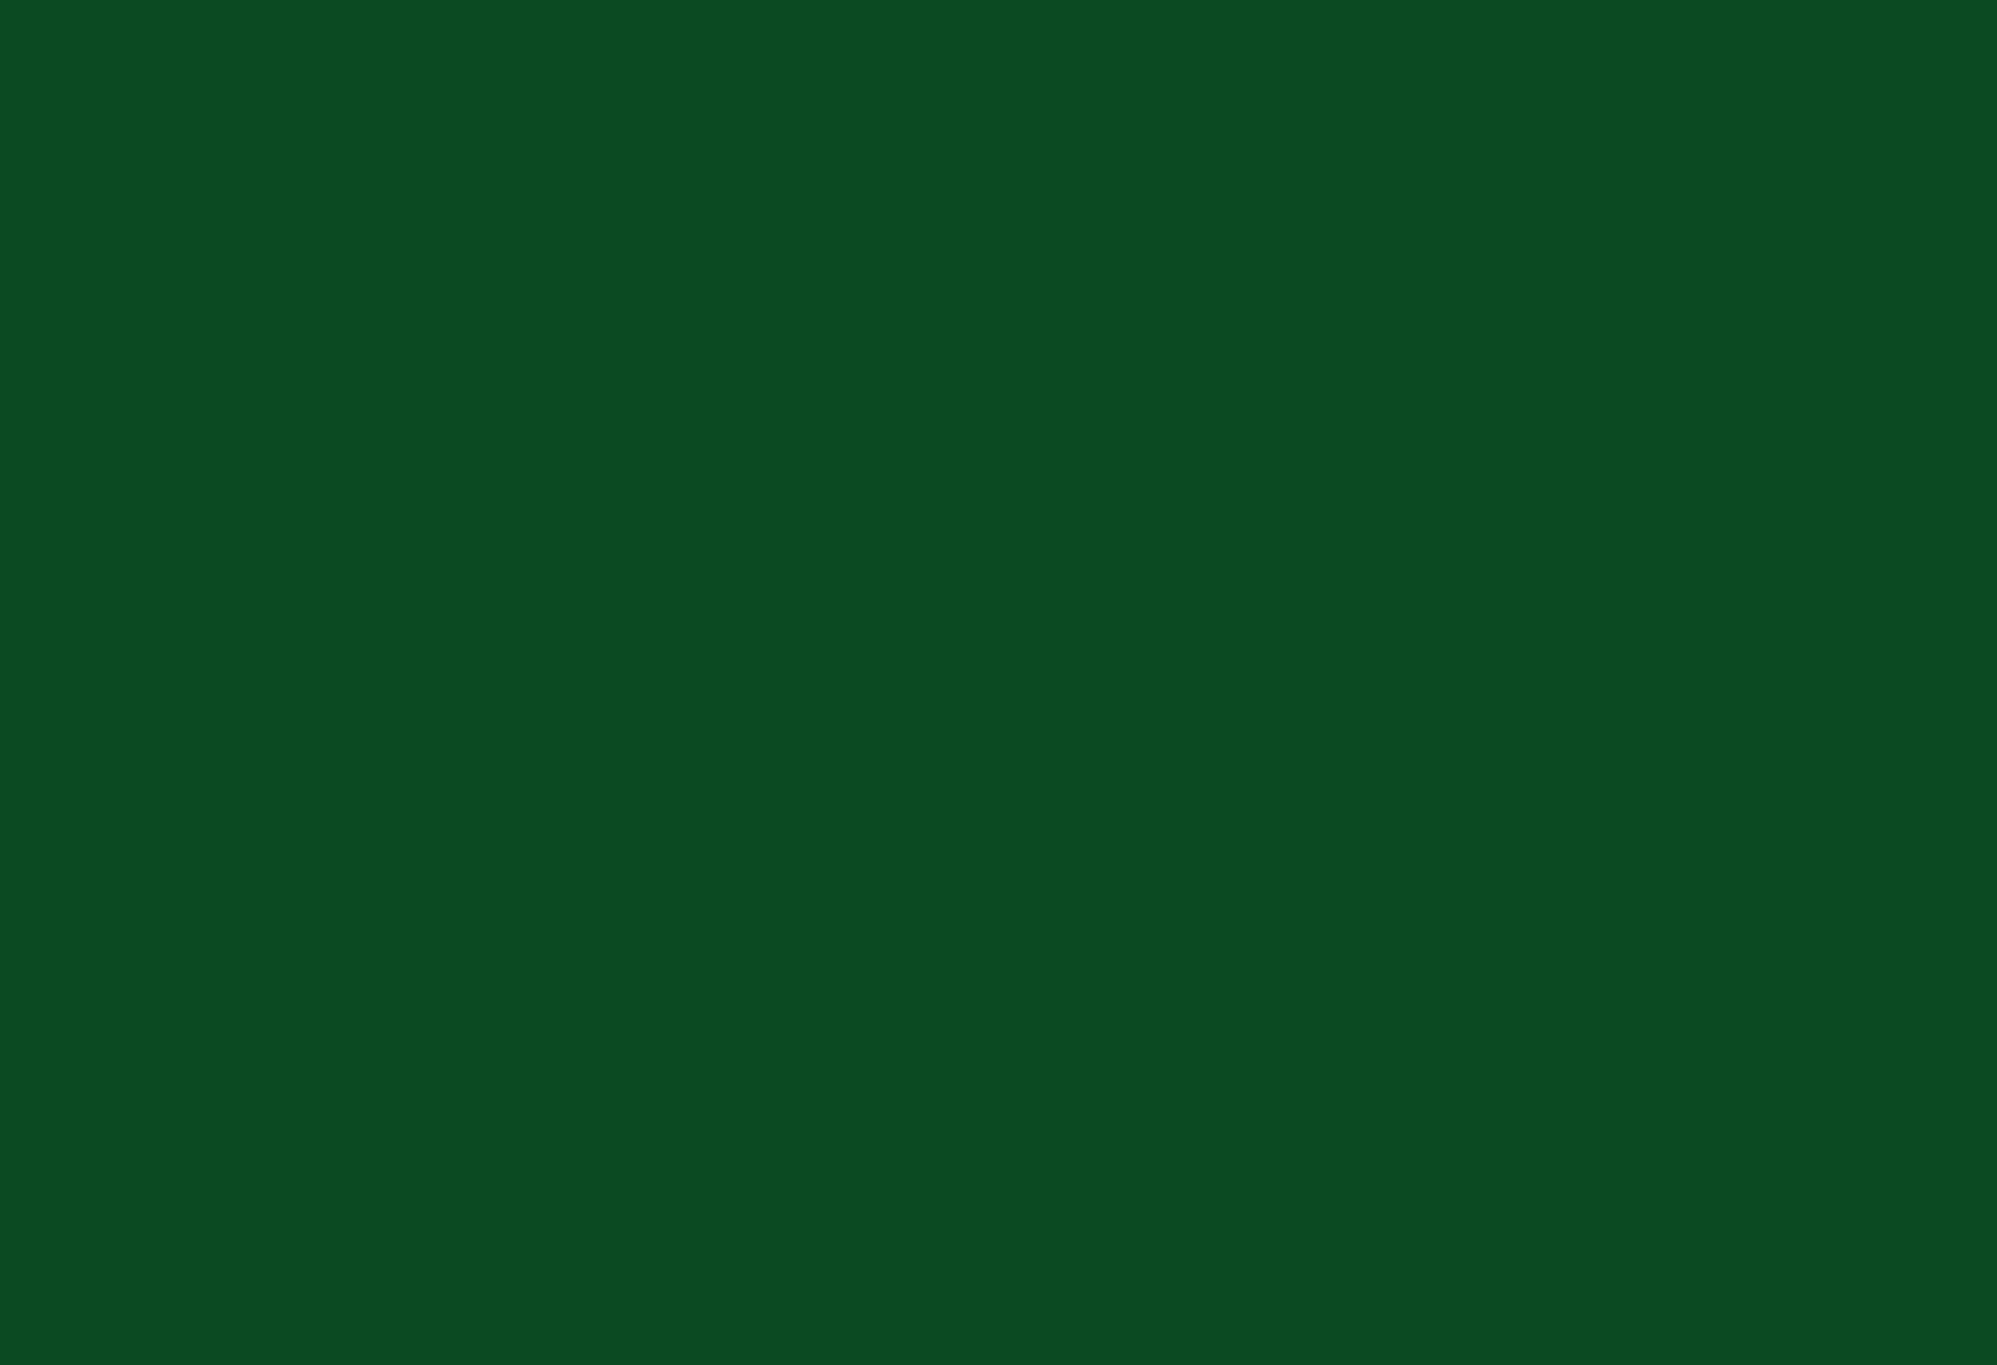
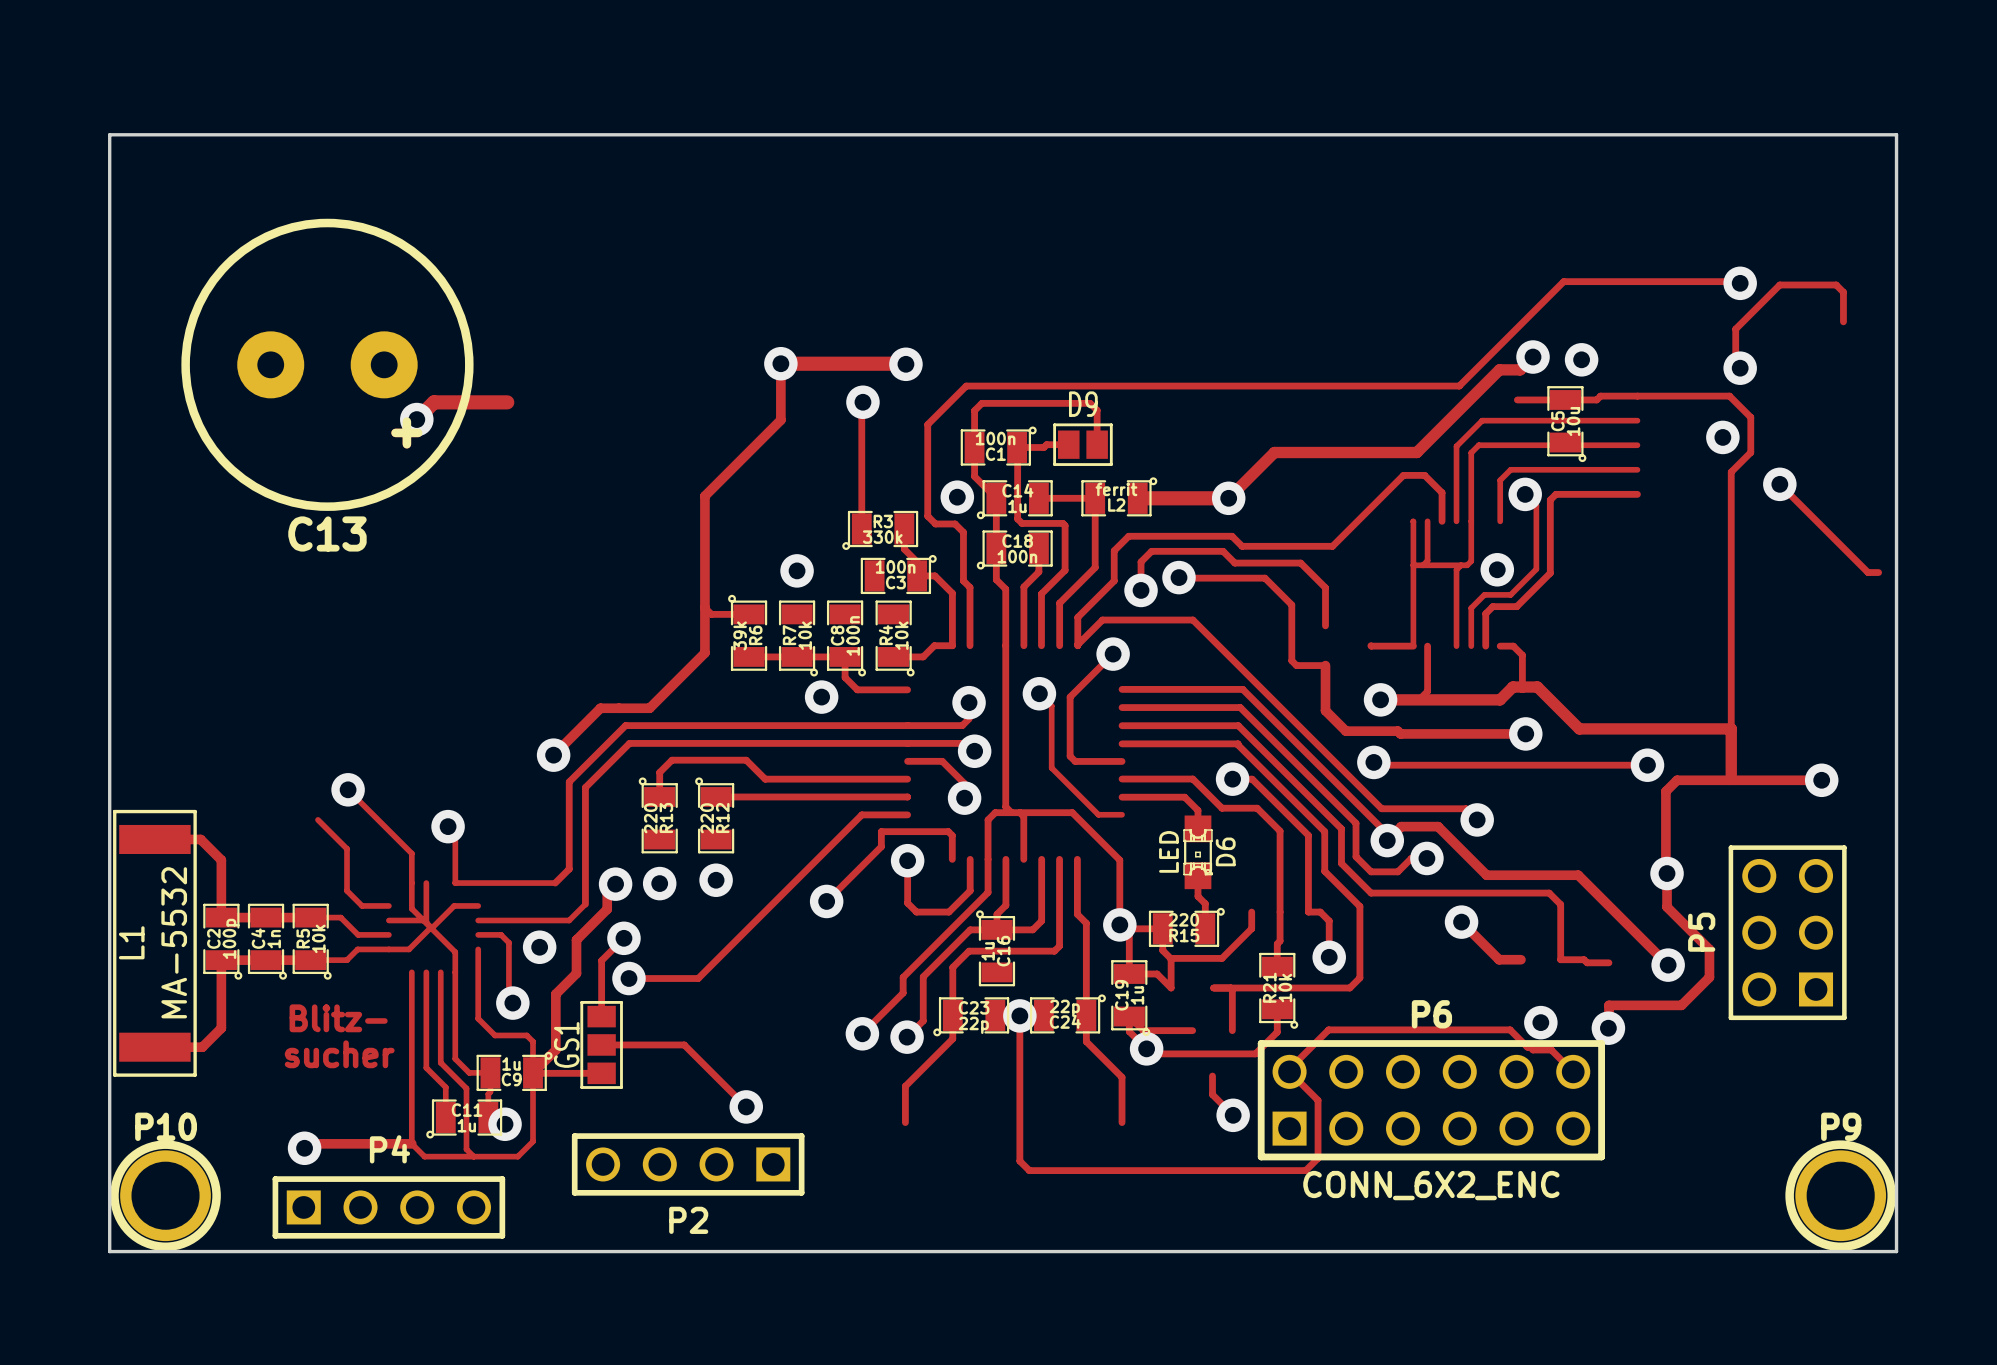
board edge: none -> (109, 134) (1896, 134) (1896, 1251) (109, 1251) (109, 134)
track: none -> (1740, 283) (1738, 281) (1563, 281) (1459, 386) (966, 386) (927, 424) (927, 516) (935, 523) (955, 523) (963, 532) (963, 580) (970, 587) (970, 645)
via: none -> (1740, 283)
track: none -> (1843, 321) (1843, 292) (1836, 284) (1779, 284) (1735, 329) (1735, 363) (1740, 368)
track: none -> (1533, 357) (1520, 369) (1499, 369) (1416, 452) (1274, 452) (1228, 498) (1137, 498)
via: none -> (1533, 357)
via: none -> (1581, 359)
via: none -> (780, 363)
C13: none -> (327, 364)
track: none -> (905, 364) (780, 363) (780, 420) (704, 496) (704, 652) (649, 708) (600, 708) (553, 755)
via: none -> (905, 364)
via: none -> (1740, 368)
track: none -> (1517, 399) (1596, 399) (1600, 396) (1729, 396) (1750, 417) (1750, 452) (1731, 472) (1731, 728)
track: none -> (507, 402) (434, 402) (416, 419)
track: none -> (862, 402) (861, 529)
via: none -> (862, 402)
via: none -> (416, 419)
track: none -> (1637, 420) (1482, 420) (1456, 446) (1456, 521)
C5: none -> 10u (1566, 424)
via: none -> (1722, 437)
track: none -> (1068, 444) (1017, 447) (1017, 518) (1022, 523) (1062, 523) (1065, 525) (1065, 570) (1041, 593) (1041, 645)
D9: none -> (1082, 444)
track: none -> (1097, 444) (1097, 410) (1090, 403) (981, 403) (974, 410) (974, 476) (996, 498) (996, 579) (1005, 589) (1005, 806) (1011, 812)
track: none -> (1637, 445) (1478, 445) (1471, 452) (1471, 561) (1467, 565) (1413, 565)
C1: none -> 100n (998, 446)
track: none -> (1637, 469) (1510, 469) (1500, 480) (1500, 521)
track: none -> (1779, 484) (1868, 572) (1878, 572)
via: none -> (1779, 484)
track: none -> (1525, 494) (1536, 505) (1536, 569) (1510, 594) (1484, 594) (1471, 608) (1471, 646)
via: none -> (1525, 494)
track: none -> (1637, 494) (1555, 494) (1550, 499) (1550, 573) (1516, 606) (1492, 606) (1485, 613) (1485, 646)
L2: none -> ferrit (1119, 496)
via: none -> (957, 497)
track: none -> (1038, 498) (1095, 498) (1095, 567) (1059, 603) (1059, 645)
via: none -> (1228, 498)
C14: none -> 1u (1014, 499)
track: none -> (1413, 521) (1413, 646) (1370, 645)
track: none -> (1427, 521) (1427, 560) (1423, 565)
track: none -> (1442, 521) (1442, 492) (1424, 475) (1403, 475) (1332, 546) (1242, 546) (1232, 536) (1128, 536) (1114, 550) (1114, 580) (1077, 617) (1077, 645)
track: none -> (904, 529) (904, 549) (917, 562) (917, 575) (934, 575) (952, 593) (952, 645) (934, 645) (923, 656) (893, 656)
R3: none -> 330k (880, 530)
track: none -> (1038, 548) (1038, 571) (1023, 586) (1023, 645)
C18: none -> 100n (1014, 549)
track: none -> (1460, 565) (1456, 569) (1456, 646)
via: none -> (1497, 569)
via: none -> (797, 570)
C3: none -> 100n (898, 574)
track: none -> (1179, 577) (1264, 578) (1291, 604) (1291, 660) (1296, 665) (1325, 665) (1325, 710) (1345, 731) (1397, 731) (1400, 733) (1525, 733)
via: none -> (1179, 577)
track: none -> (1141, 590) (1141, 561) (1151, 551) (1223, 551) (1234, 563) (1300, 563) (1325, 587) (1325, 625)
via: none -> (1141, 590)
track: none -> (704, 607) (711, 614) (749, 614)
R6: none -> 39k (747, 632)
R7: none -> 10k (798, 638)
C8: none -> 100n (846, 638)
R4: none -> 10k (895, 638)
track: none -> (1077, 644) (1102, 620) (1192, 620) (1381, 808) (1466, 808) (1477, 819)
track: none -> (1427, 646) (1427, 691) (1419, 699) (1380, 699) (1500, 699) (1512, 687) (1537, 687) (1579, 728) (1731, 728)
track: none -> (1500, 646) (1513, 646) (1522, 655) (1522, 687)
track: none -> (1113, 654) (1070, 697) (1070, 756) (1075, 761) (1122, 761)
via: none -> (1113, 654)
track: none -> (749, 656) (845, 656) (845, 677) (857, 689) (907, 689)
track: none -> (1122, 689) (1242, 689) (1387, 833) (1387, 840) (1401, 826) (1438, 826) (1486, 875) (1578, 875) (1668, 965)
track: none -> (1039, 693) (1051, 706) (1051, 768) (1098, 814) (1122, 814)
via: none -> (1039, 693)
via: none -> (821, 697)
via: none -> (1380, 699)
track: none -> (969, 702) (969, 718) (962, 725) (625, 725) (569, 781) (569, 869) (555, 883) (455, 883) (455, 833) (448, 826)
via: none -> (969, 702)
track: none -> (1122, 707) (1240, 707) (1356, 823) (1356, 856) (1371, 871) (1397, 871) (1411, 858) (1426, 858)
track: none -> (1122, 725) (1238, 725) (1341, 828) (1341, 863) (1371, 893) (1549, 893) (1560, 904) (1560, 959) (1608, 962)
track: none -> (1731, 728) (1731, 778) (1729, 780)
via: none -> (1525, 733)
track: none -> (1122, 743) (1238, 743) (1324, 831) (1324, 871) (1359, 906) (1359, 977) (1349, 988) (1213, 988)
track: none -> (974, 751) (966, 743) (629, 743) (585, 787) (585, 904) (569, 920) (478, 920)
via: none -> (974, 751)
via: none -> (553, 755)
track: none -> (907, 761) (942, 761) (964, 783) (964, 798)
track: none -> (1373, 762) (1376, 765) (1647, 765)
via: none -> (1373, 762)
via: none -> (1647, 765)
track: none -> (907, 779) (765, 779) (746, 760) (671, 760) (659, 772) (659, 796)
track: none -> (1122, 779) (1192, 779) (1222, 808) (1257, 808) (1280, 831) (1280, 941) (1277, 943) (1277, 966)
track: none -> (1232, 779) (1252, 779) (1308, 835) (1308, 912) (1320, 912) (1329, 921) (1329, 957)
via: none -> (1232, 779)
track: none -> (1821, 780) (1677, 780) (1665, 791) (1667, 907) (1709, 949) (1709, 977) (1681, 1005) (1608, 1005) (1608, 1028)
via: none -> (1821, 780)
track: none -> (348, 789) (411, 853) (411, 908) (455, 952) (455, 1058) (469, 1072) (490, 1072) (488, 1117) (498, 1117) (505, 1124)
via: none -> (348, 789)
track: none -> (716, 796) (907, 796)
track: none -> (1122, 797) (1184, 797) (1197, 810) (1197, 828)
via: none -> (964, 798)
track: none -> (1019, 812) (1023, 816) (1023, 859)
track: none -> (907, 814) (861, 814) (698, 978) (628, 978)
R13: none -> 220 (658, 815)
R12: none -> 220 (714, 815)
track: none -> (318, 819) (347, 848) (347, 890) (362, 905) (388, 905)
via: none -> (1477, 819)
via: none -> (448, 826)
track: none -> (154, 839) (200, 839) (221, 860) (221, 917) (340, 917) (358, 934) (388, 934)
via: none -> (1387, 840)
D6: none -> LED (1197, 852)
via: none -> (1426, 858)
track: none -> (952, 859) (952, 835) (948, 831) (881, 831) (881, 846) (826, 901)
track: none -> (970, 859) (970, 890) (948, 912) (916, 912) (907, 903) (907, 860)
track: none -> (1005, 859) (1005, 905) (996, 914) (996, 929)
track: none -> (1041, 859) (1041, 920) (1032, 929) (970, 929) (923, 976) (923, 1020) (907, 1037)
track: none -> (1059, 859) (1059, 946) (1054, 951) (969, 951) (952, 967) (952, 1038) (905, 1086) (905, 1122)
track: none -> (1077, 859) (1077, 914) (1086, 923) (1086, 1041) (1122, 1077) (1122, 1122)
via: none -> (907, 860)
via: none -> (1667, 873)
track: none -> (1197, 875) (1197, 896) (1205, 903) (1205, 928)
via: none -> (716, 880)
track: none -> (426, 883) (426, 922) (431, 928)
via: none -> (659, 883)
track: none -> (615, 884) (607, 892) (607, 909) (576, 939) (576, 973) (555, 994) (555, 1050) (533, 1072) (601, 1073)
via: none -> (615, 884)
via: none -> (826, 901)
track: none -> (478, 905) (454, 905) (431, 928)
track: none -> (1251, 912) (1251, 928) (1222, 958) (1170, 958)
track: none -> (388, 920) (426, 921)
track: none -> (1461, 922) (1499, 959) (1520, 959)
via: none -> (1461, 922)
via: none -> (1119, 924)
track: none -> (431, 927) (409, 949) (357, 949) (346, 960) (221, 960) (221, 1028) (202, 1047) (154, 1047)
R15: none -> 220 (1186, 927)
track: none -> (1123, 928) (1162, 928) (1162, 950) (1171, 958) (1171, 988) (1157, 973) (1129, 973) (1129, 934) (1119, 924) (1119, 860) (1072, 812) (995, 812) (988, 819) (988, 892) (903, 977) (903, 993) (862, 1033)
P5: none -> (1787, 932)
track: none -> (478, 934) (501, 934) (508, 942) (508, 999) (512, 1003)
track: none -> (623, 938) (601, 960) (601, 1016)
via: none -> (623, 938)
C2: none -> 100p (222, 941)
C4: none -> 1n (267, 941)
R5: none -> 10k (312, 941)
L1: none -> MA-5532 (154, 943)
via: none -> (539, 947)
C16: none -> 1u (995, 948)
track: none -> (478, 949) (478, 1018) (494, 1035) (526, 1035) (533, 1041) (533, 1141) (517, 1156) (424, 1156) (411, 1143)
via: none -> (1329, 957)
via: none -> (1668, 965)
track: none -> (411, 972) (411, 1143)
track: none -> (426, 972) (426, 1067) (445, 1087) (445, 1117)
track: none -> (440, 972) (440, 1062) (466, 1088) (466, 1149) (473, 1156)
via: none -> (628, 978)
track: none -> (1230, 988) (1232, 1030)
R21: none -> 10k (1278, 990)
C19: none -> 1u (1130, 998)
via: none -> (512, 1003)
track: none -> (1277, 1009) (1277, 1032) (1255, 1053) (1151, 1053) (1129, 1031) (1129, 1016) (1143, 1030) (1192, 1030)
C24: none -> 22p (1067, 1013)
track: none -> (1019, 1015) (1019, 1161) (1029, 1170) (1305, 1170) (1318, 1158) (1318, 1100) (1289, 1071) (1289, 1068) (1328, 1029) (1510, 1029) (1527, 1047) (1533, 1049) (1551, 1049) (1573, 1071)
via: none -> (1019, 1015)
C23: none -> 22p (971, 1016)
text: none -> Blitz- (338, 1018)
via: none -> (1540, 1022)
via: none -> (1608, 1028)
via: none -> (862, 1033)
via: none -> (907, 1037)
track: none -> (601, 1044) (684, 1044) (746, 1106)
GS1: none -> (601, 1044)
via: none -> (1146, 1048)
text: none -> sucher (339, 1054)
C9: none -> 1u (514, 1071)
track: none -> (1212, 1076) (1212, 1094) (1233, 1115)
P6: none -> CONN_6X2_ENC (1431, 1100)
via: none -> (746, 1106)
via: none -> (1233, 1115)
C11: none -> 1u (464, 1118)
via: none -> (505, 1124)
track: none -> (411, 1143) (308, 1143) (304, 1148)
via: none -> (304, 1148)
P2: none -> (688, 1164)
P10: none -> (165, 1195)
P9: none -> (1840, 1195)
P4: none -> (388, 1207)

